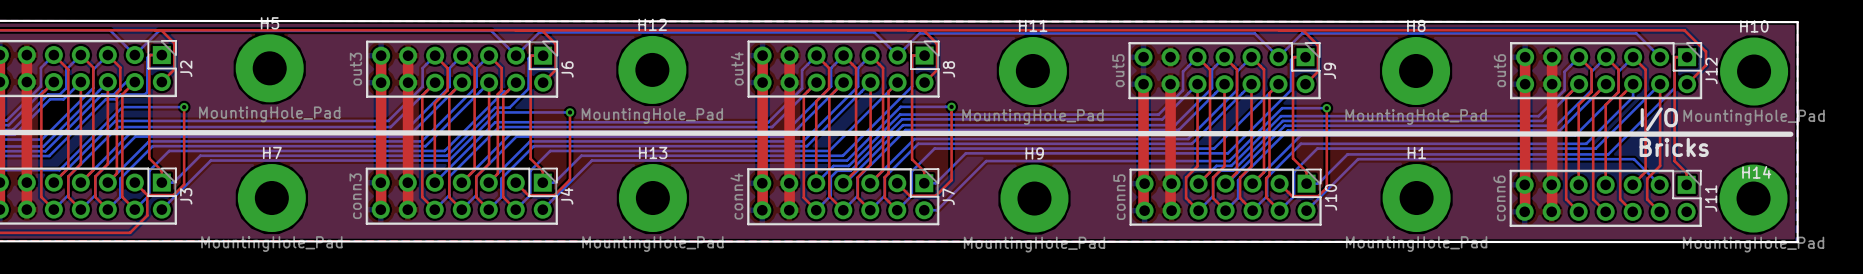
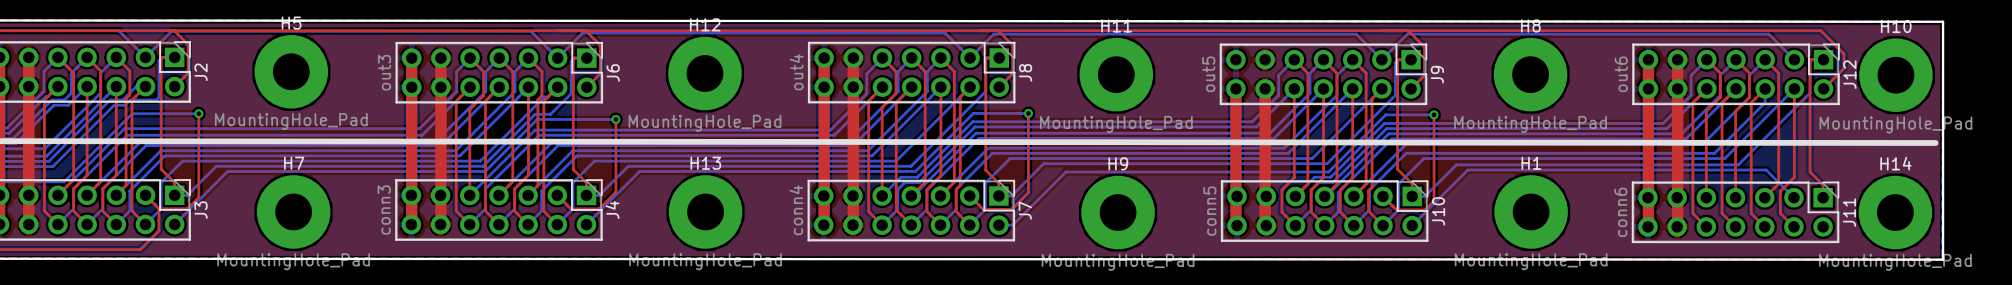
text: I/O (1659, 119) -> none
text: Bricks (1674, 147) -> none
H14 name position: H14 (1756, 172) -> H14 (1895, 163)

